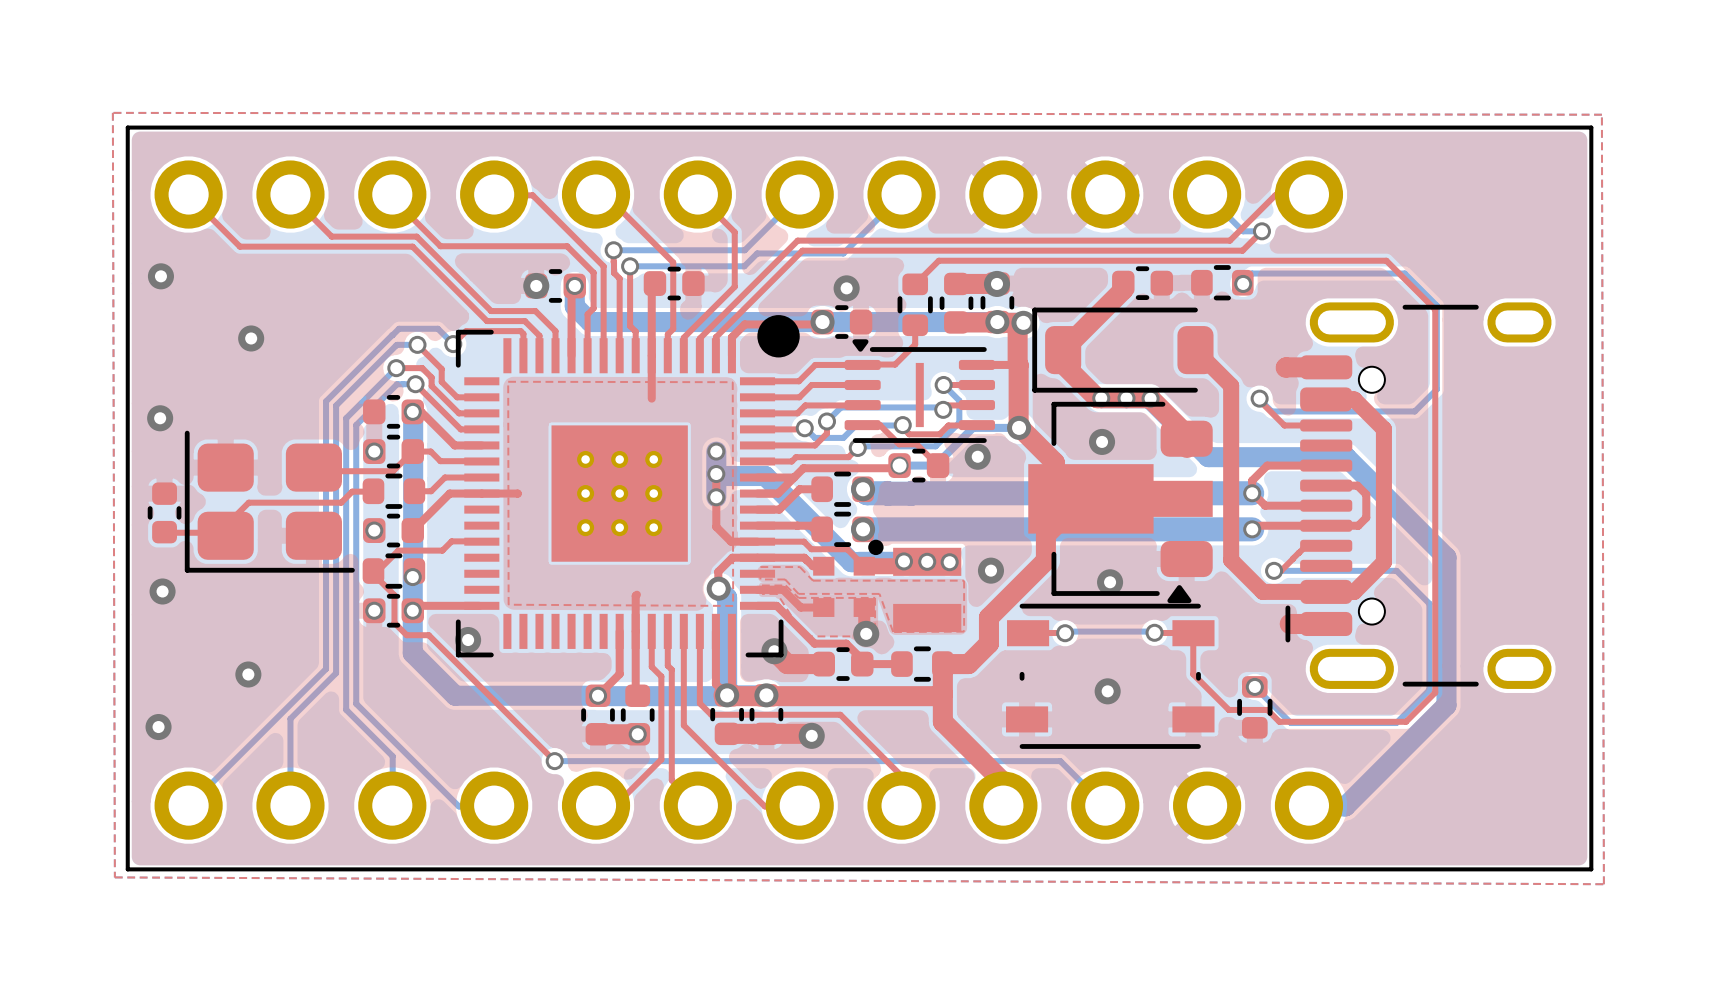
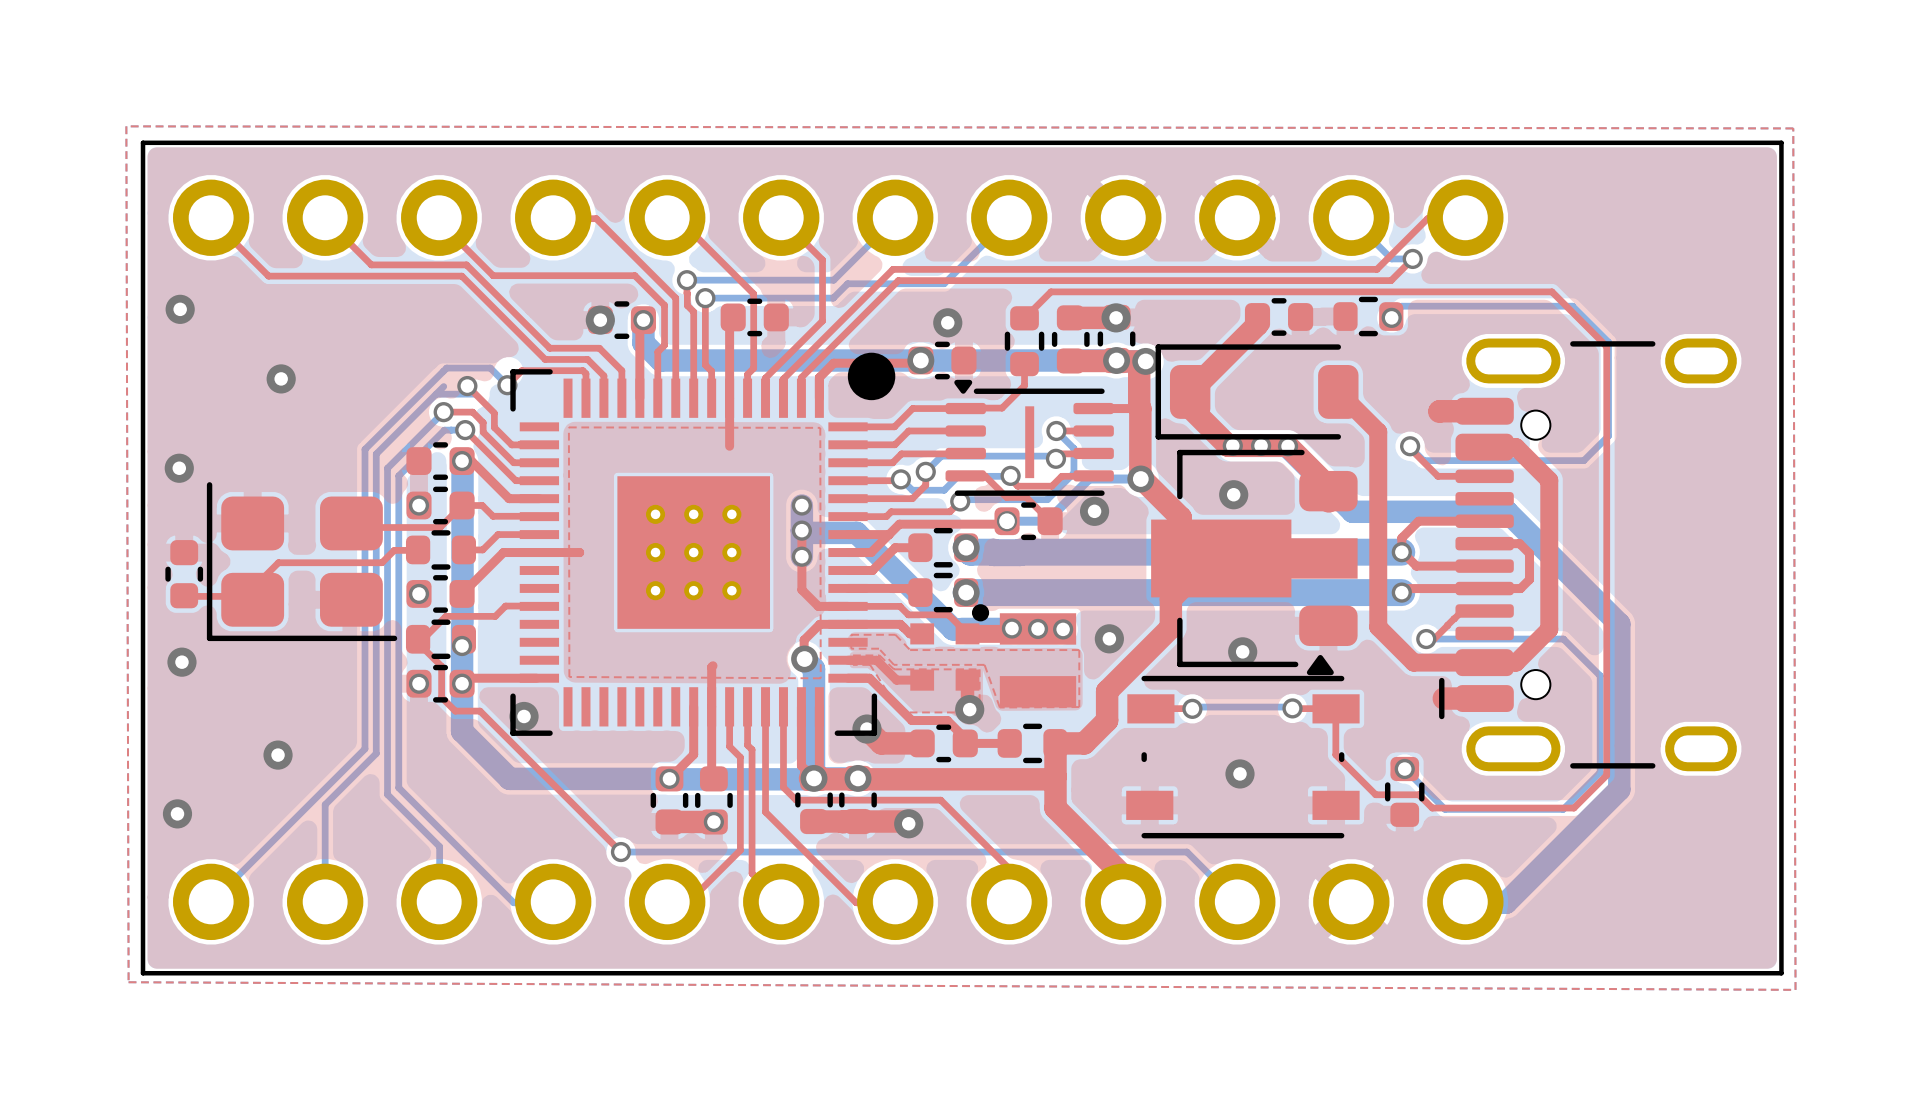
bottom track: (397, 344) (417, 344) -> none
bottom track: none -> (436, 394) (475, 394)

